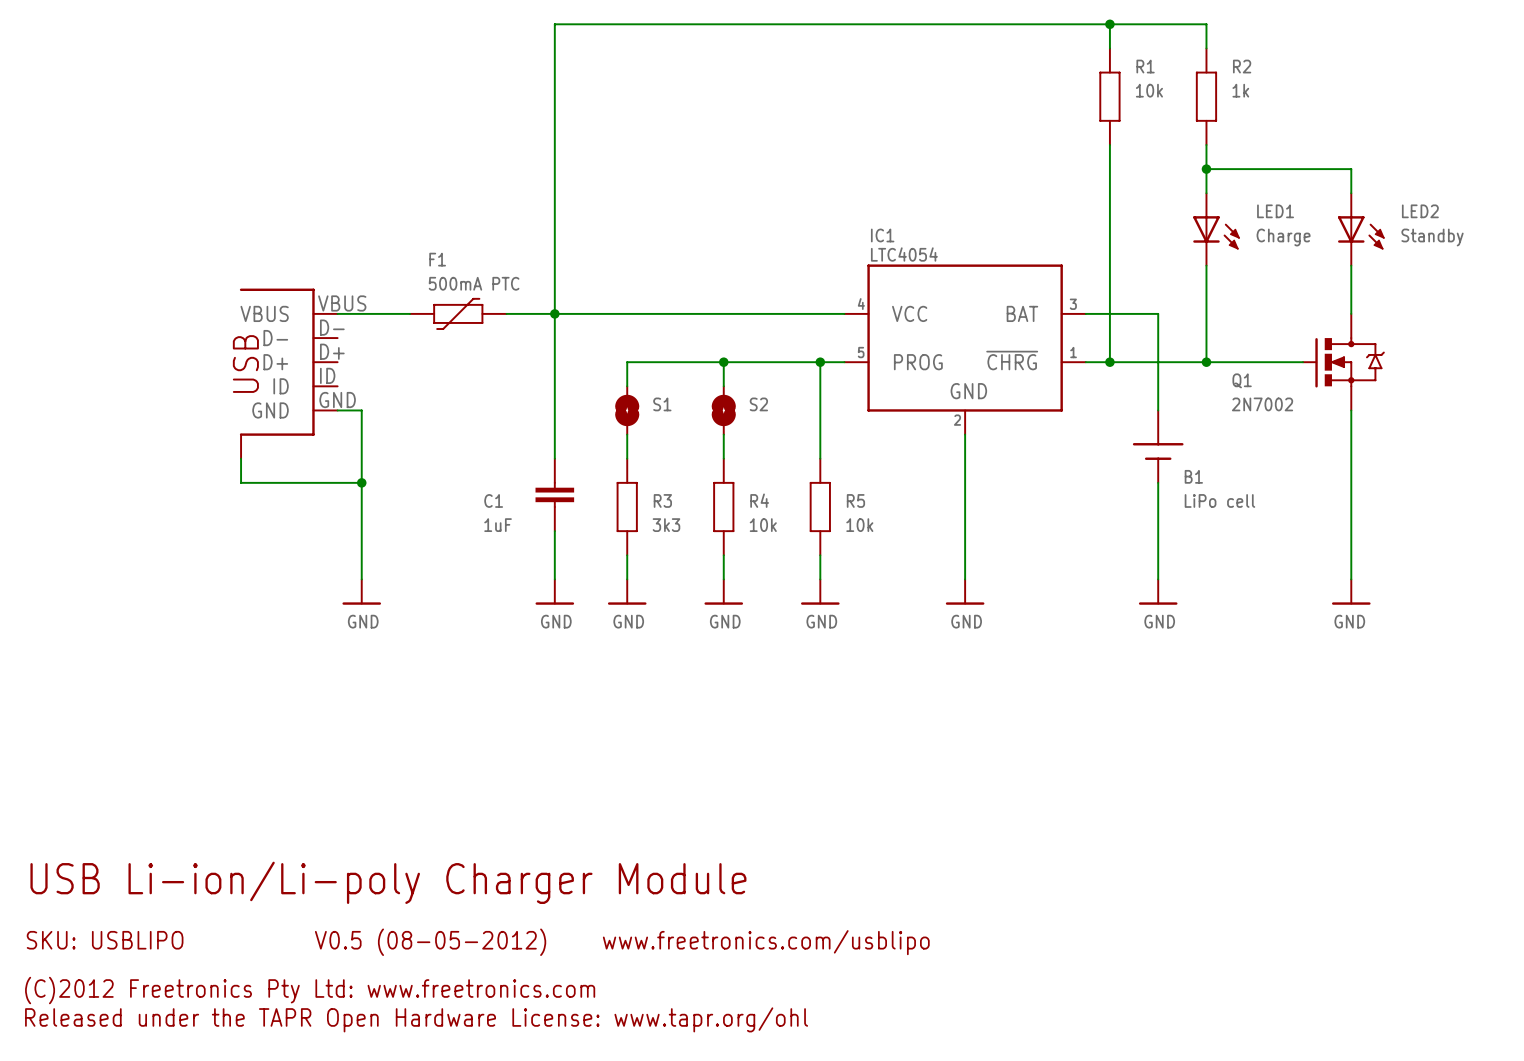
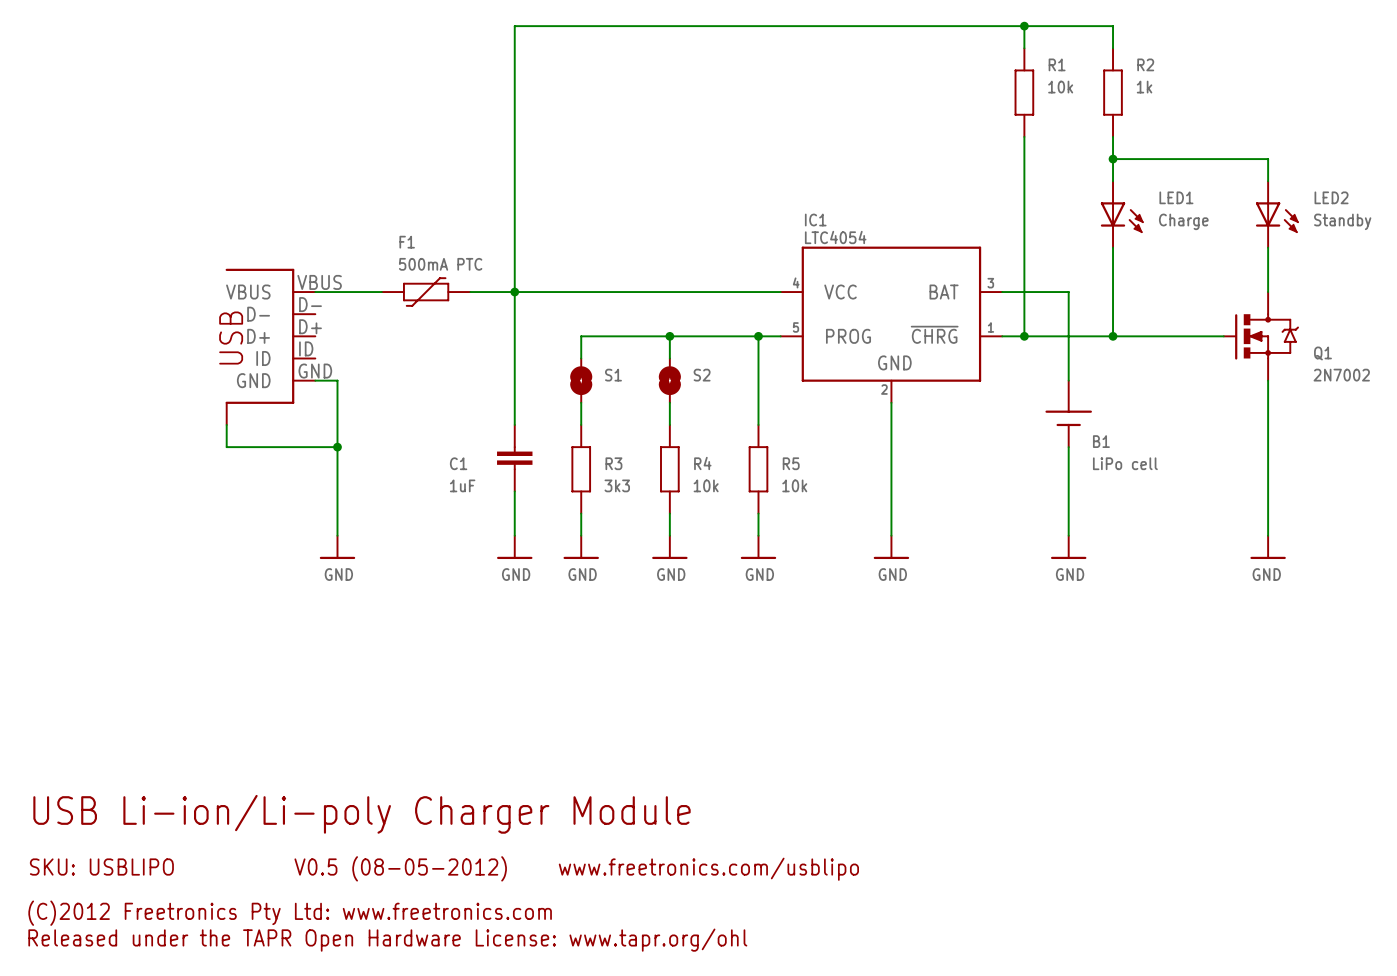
wire: (1351, 169) (1351, 193) -> (1245, 159) (1268, 159) (1268, 181)
LED2 position: (1361, 229) -> (1277, 214)
wire: (1351, 265) (1351, 313) -> (1268, 247) (1268, 292)
Q1 position: (1343, 362) -> (1260, 336)
Q1 name position: Q1 (1242, 380) -> Q1 (1322, 353)
Q1 value position: 2N7002 (1262, 404) -> 2N7002 (1341, 375)
wire: (1351, 410) (1351, 579) -> (1268, 380) (1268, 535)
power symbol position: GND (1351, 592) -> GND (1268, 547)

